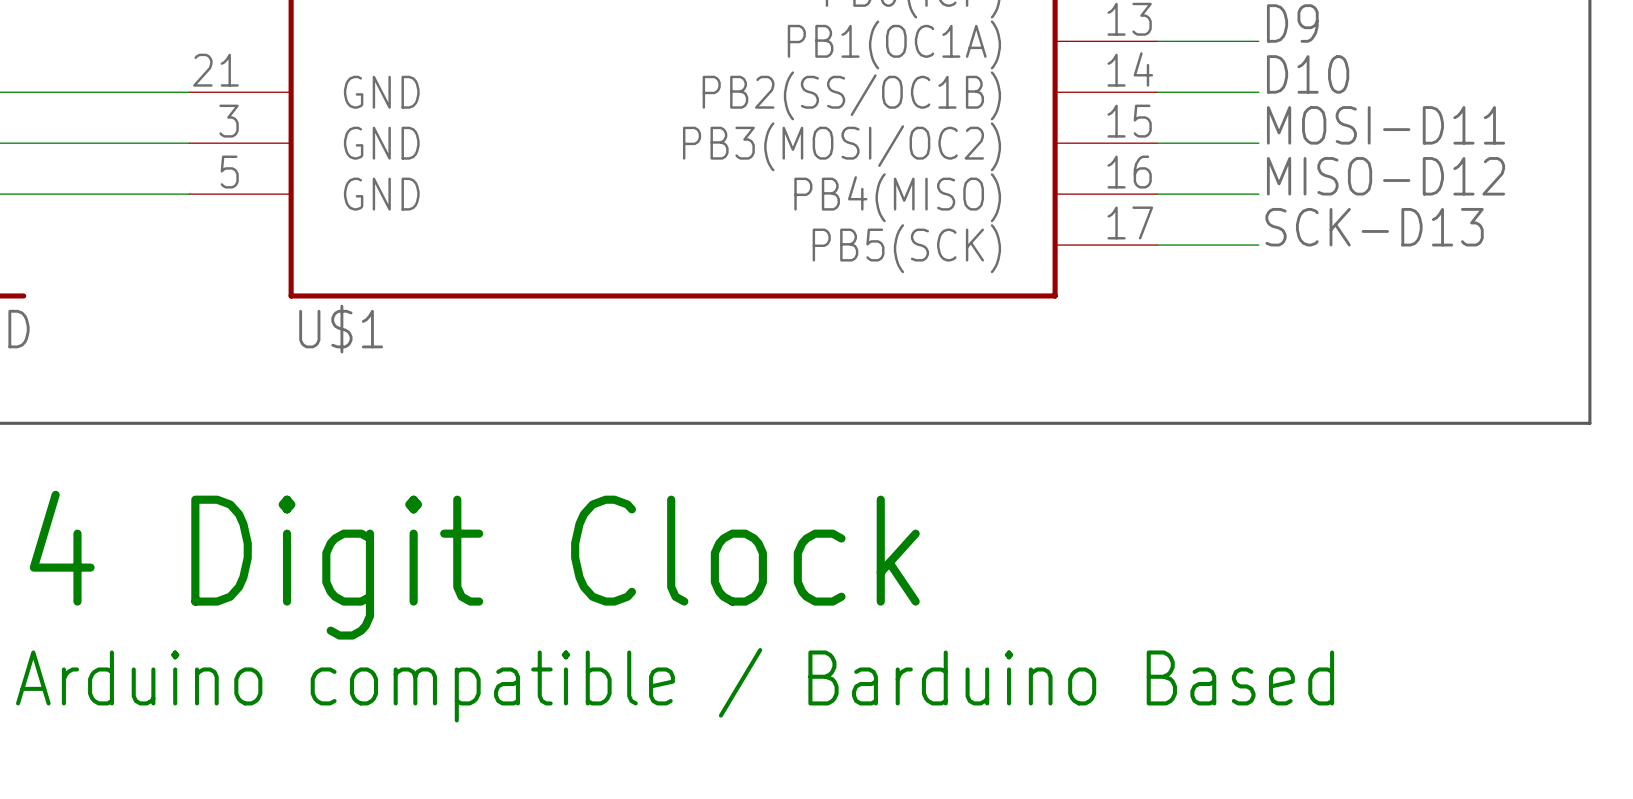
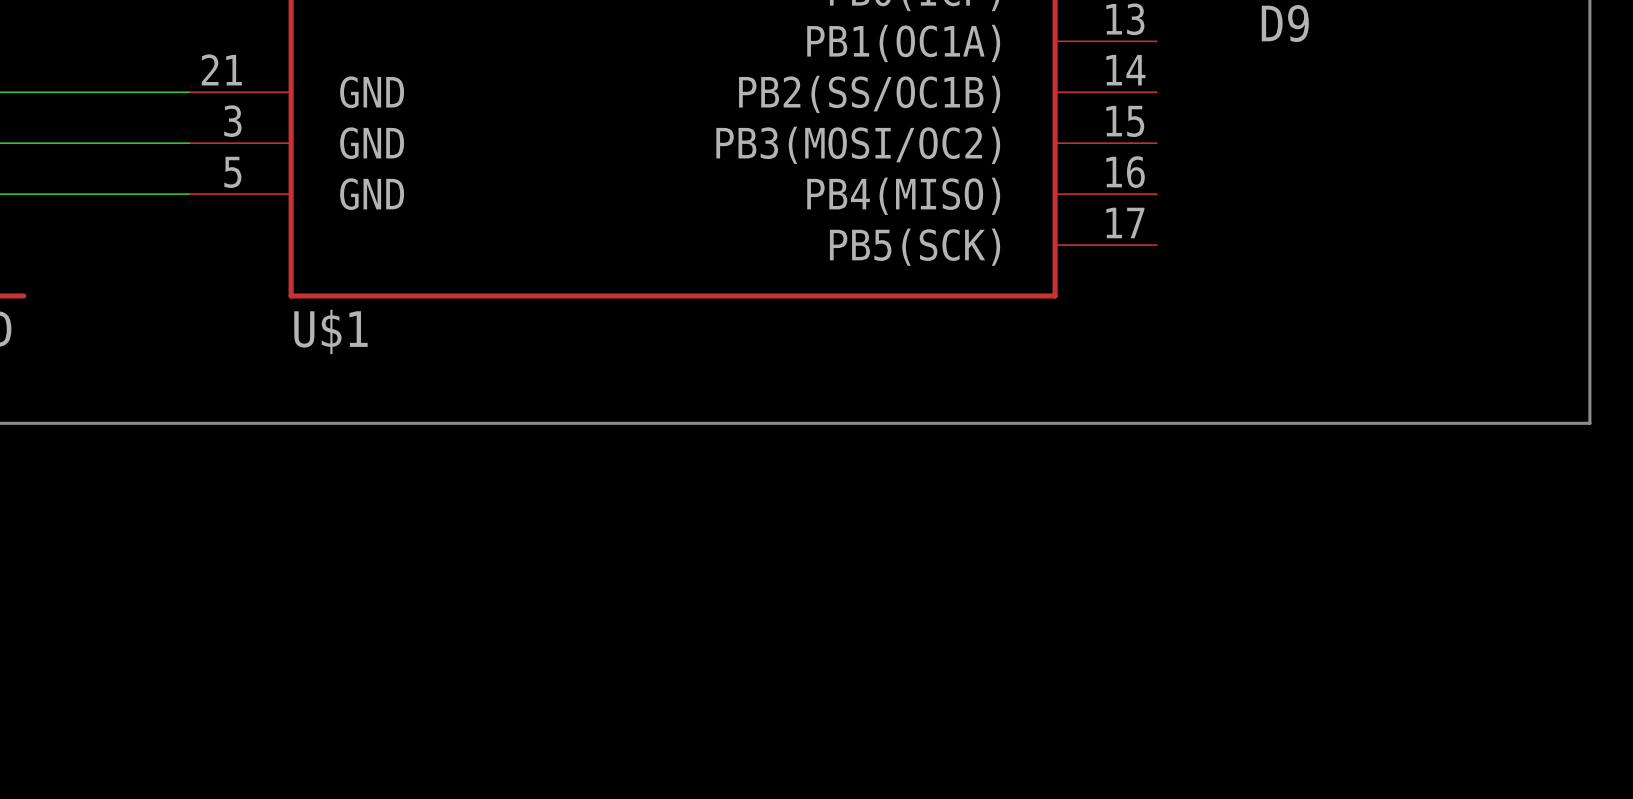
wire: (1156, 41) (1258, 41) -> none
label: D10 (1308, 74) -> none
wire: (1156, 92) (1258, 92) -> none
label: MOSI-D11 (1386, 125) -> none
wire: (1156, 143) (1258, 143) -> none
label: MISO-D12 (1386, 176) -> none
wire: (1156, 194) (1258, 194) -> none
label: SCK-D13 (1374, 227) -> none
wire: (1156, 245) (1258, 245) -> none
text: 4 Digit Clock (474, 565) -> none
text: Arduino compatible / Barduino Based (675, 685) -> none

